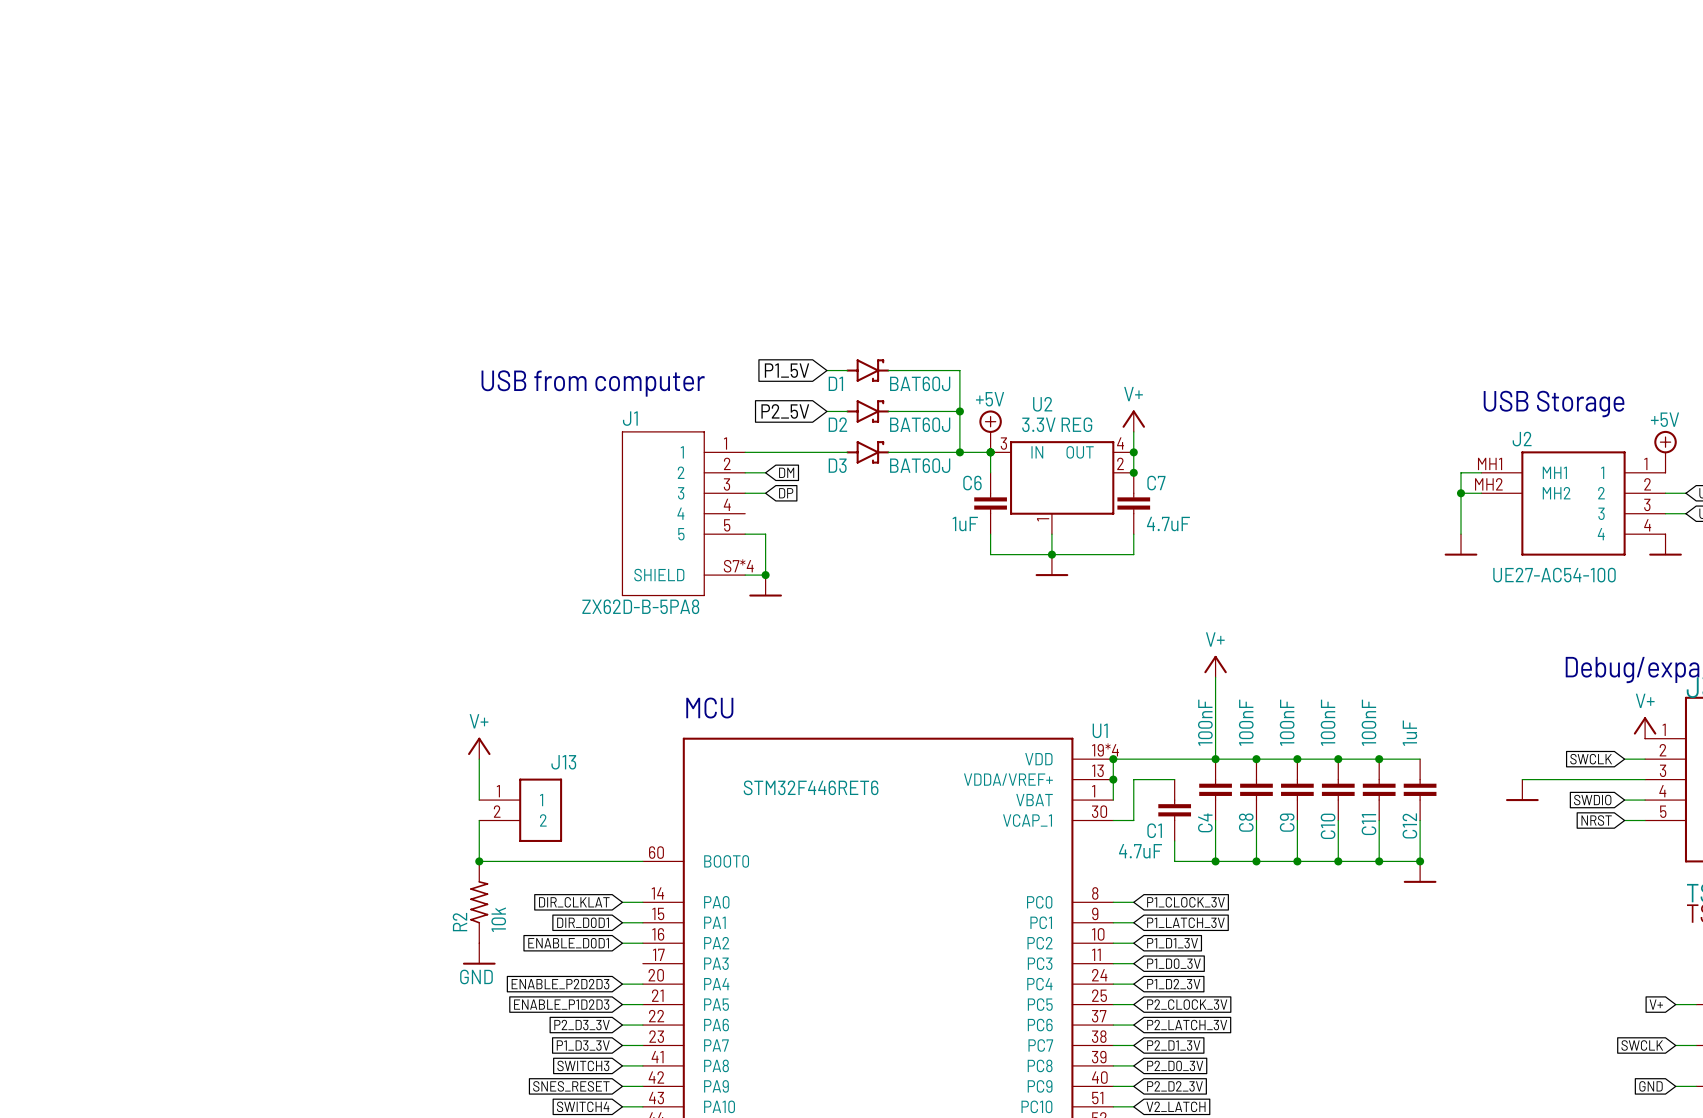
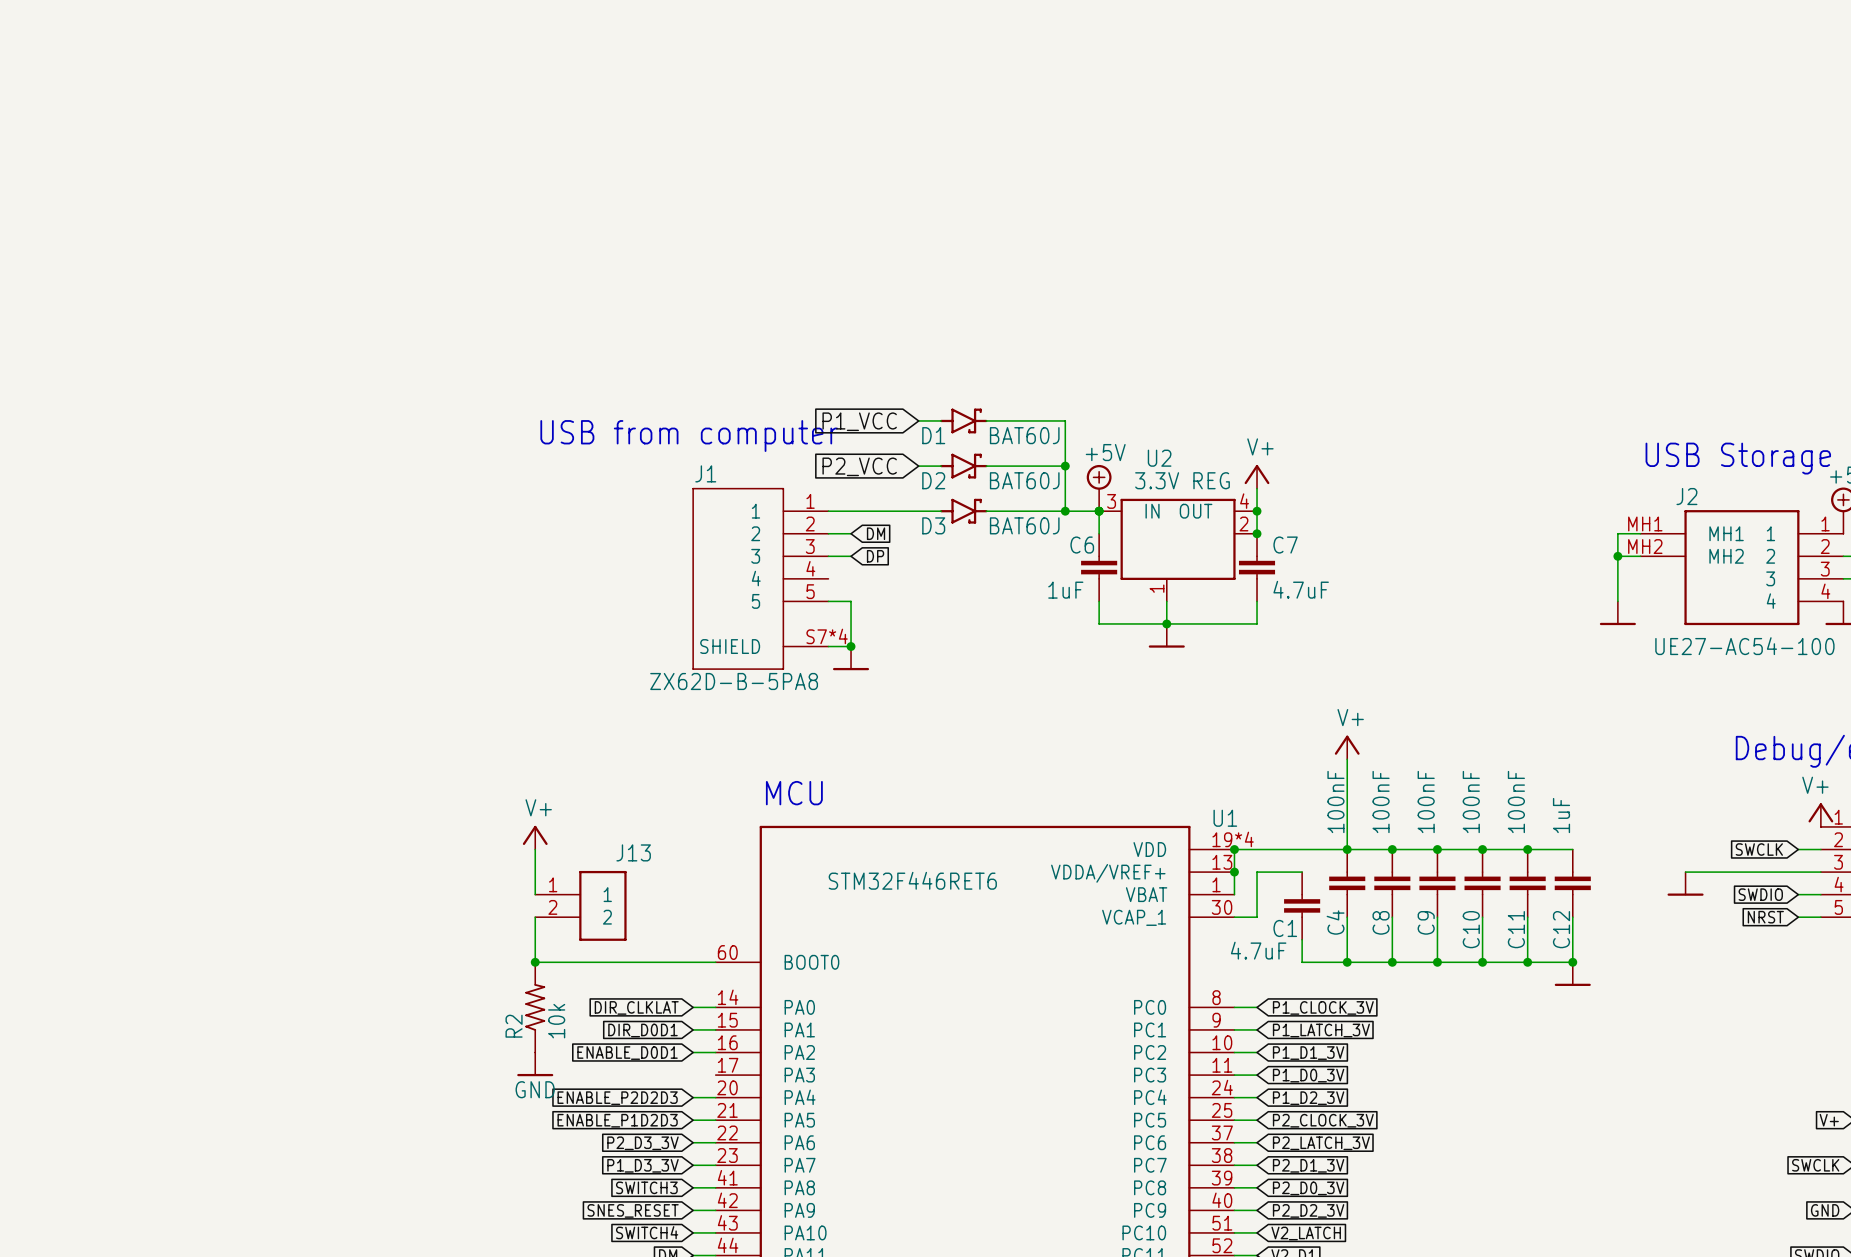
global label: P1_5V (787, 370) -> P1_VCC (859, 421)
global label: P2_5V (785, 411) -> P2_VCC (859, 466)

